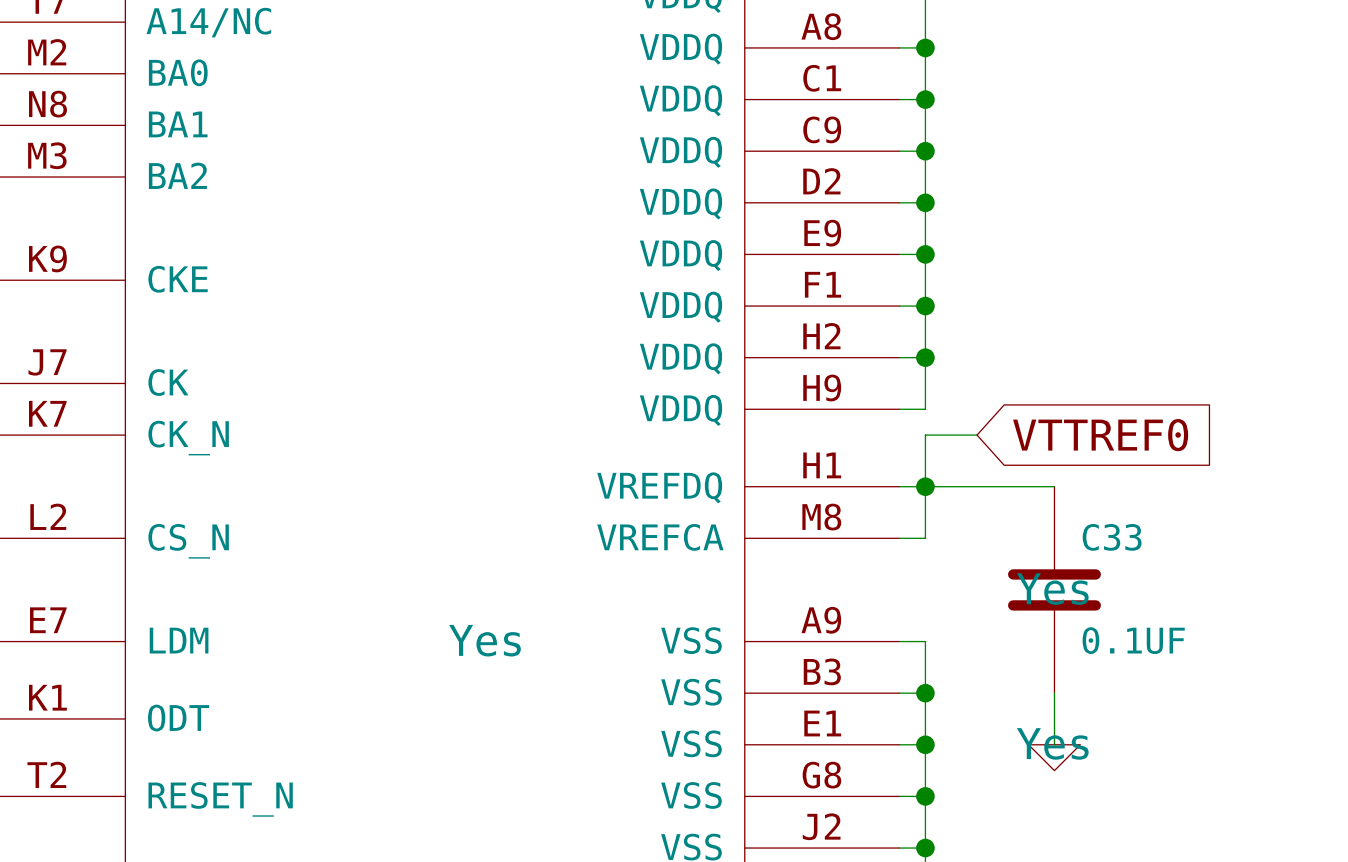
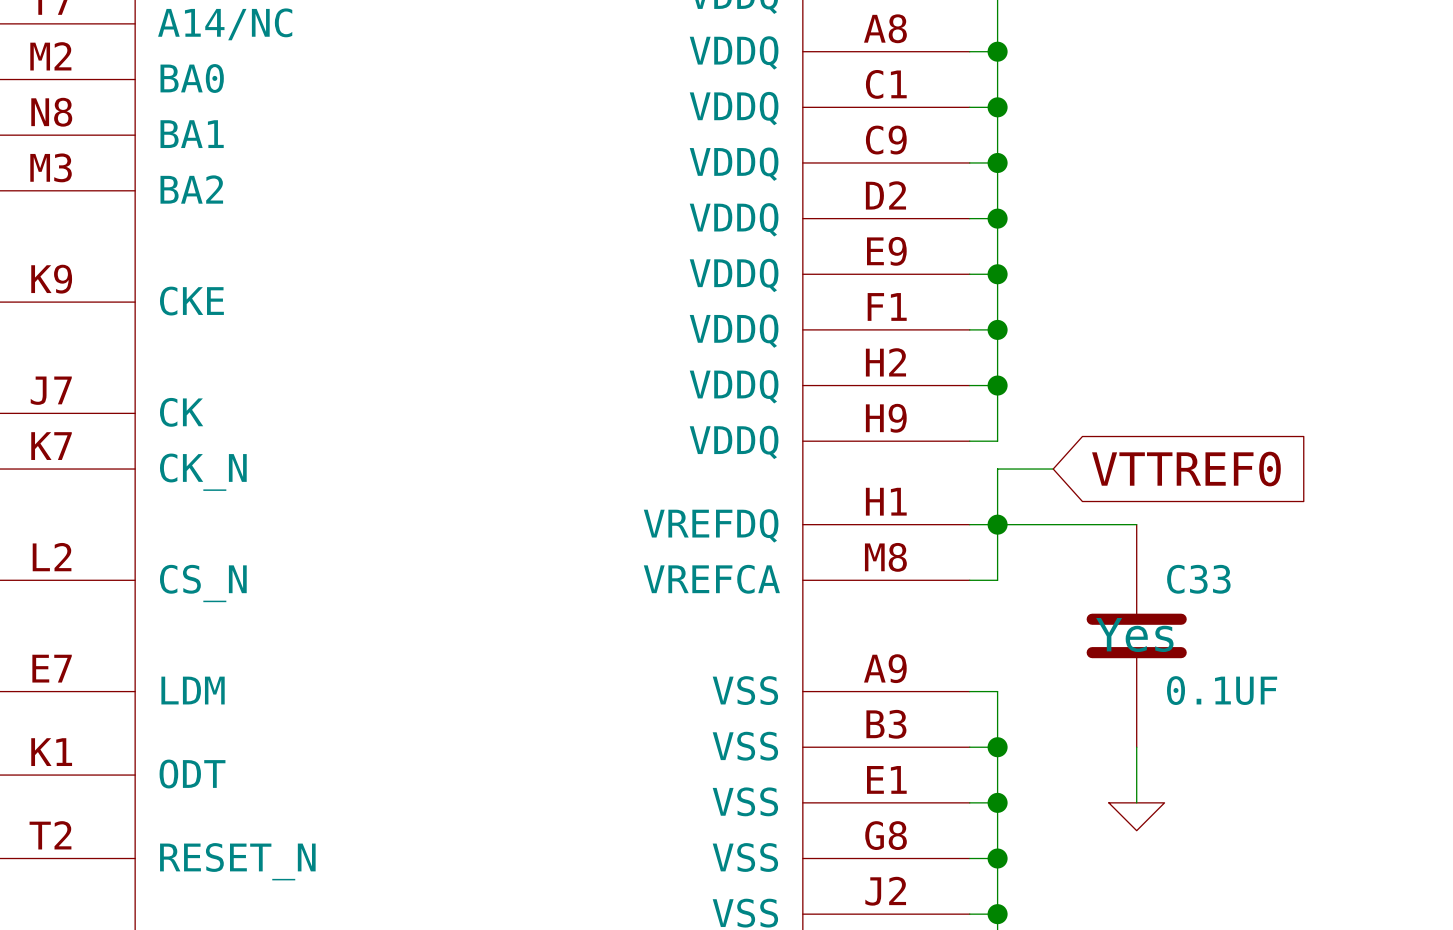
part text: Yes (484, 640) -> none
power symbol text: Yes (1052, 743) -> none

